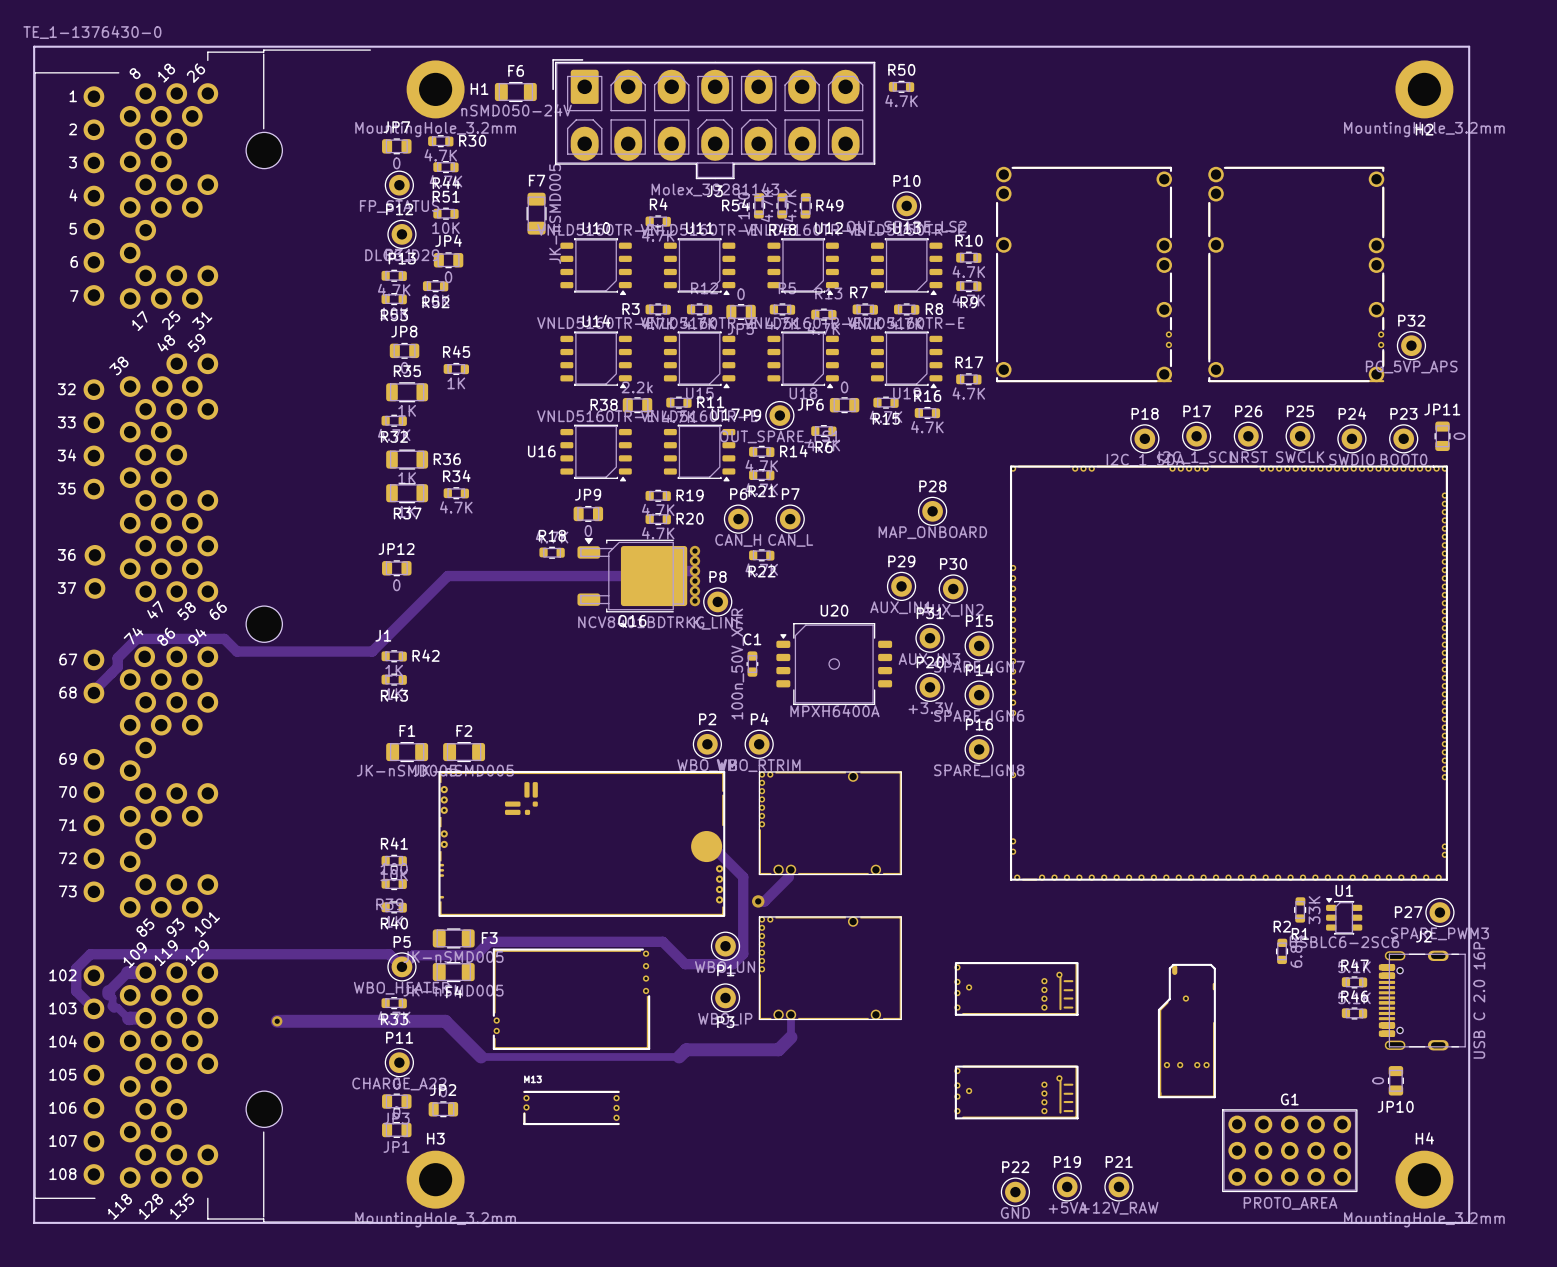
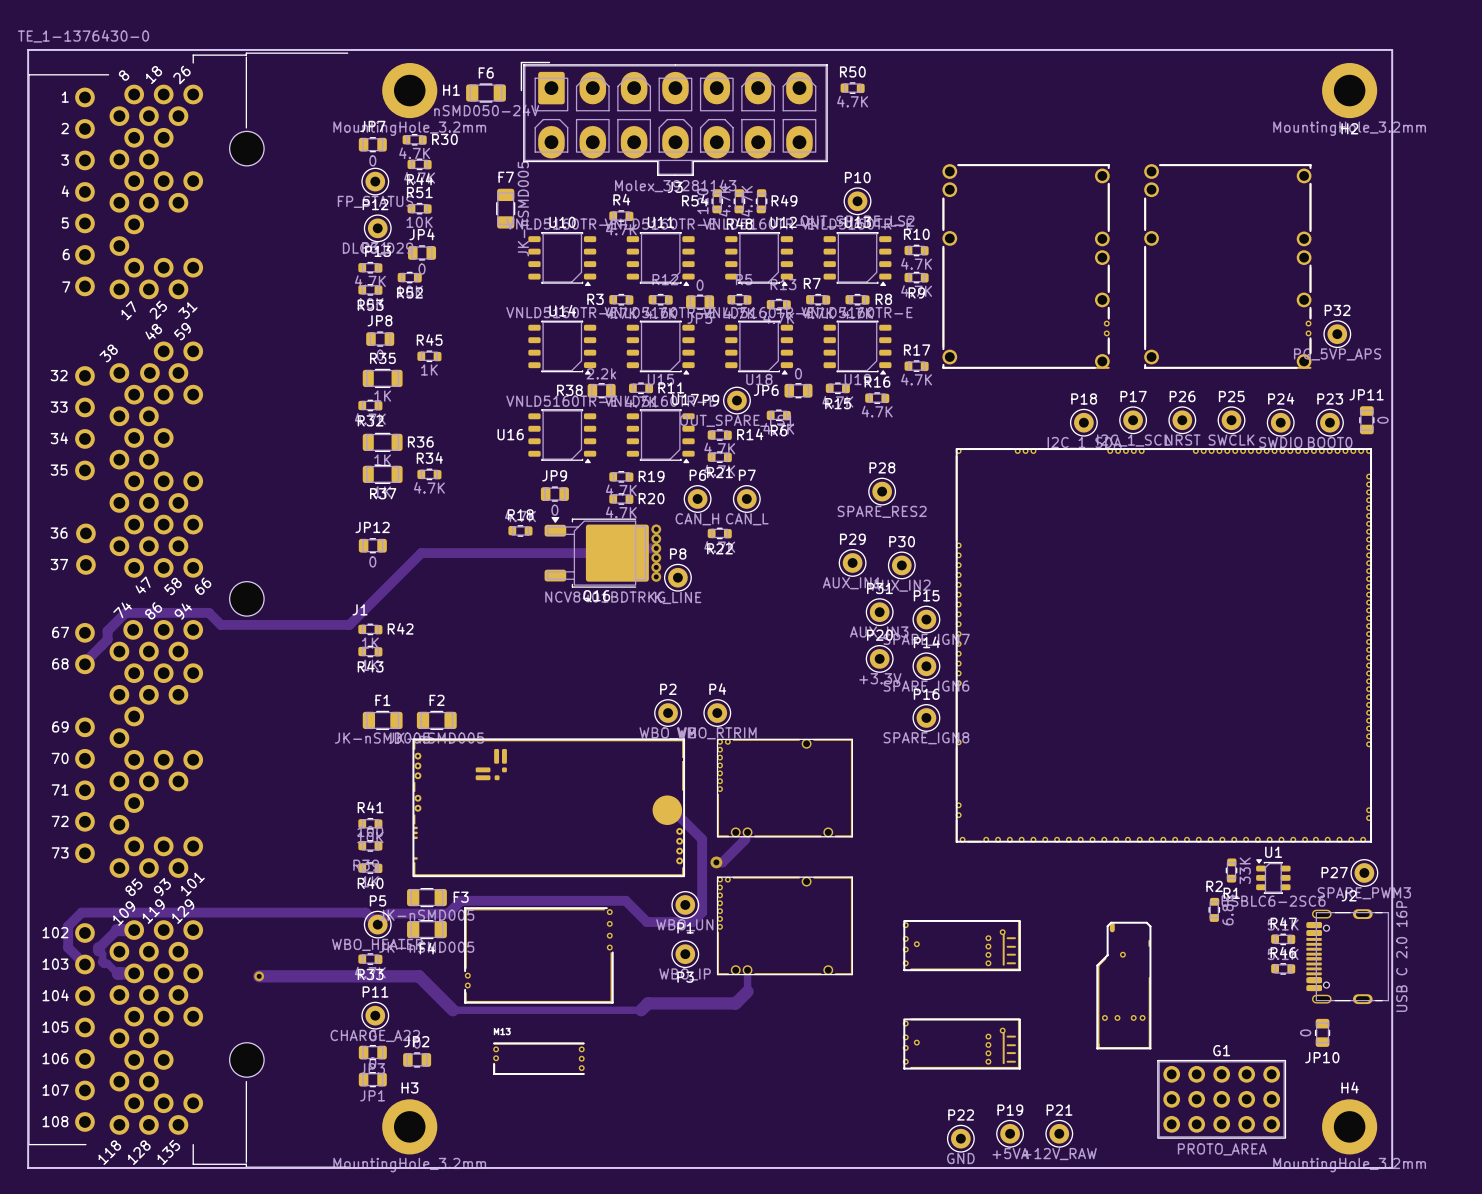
P28 value: MAP_ONBOARD (932, 532) -> SPARE_RES2 (882, 511)
C1: 100n_50V_X7R (752, 664) -> none
U20: MPXH6400A (834, 664) -> none

